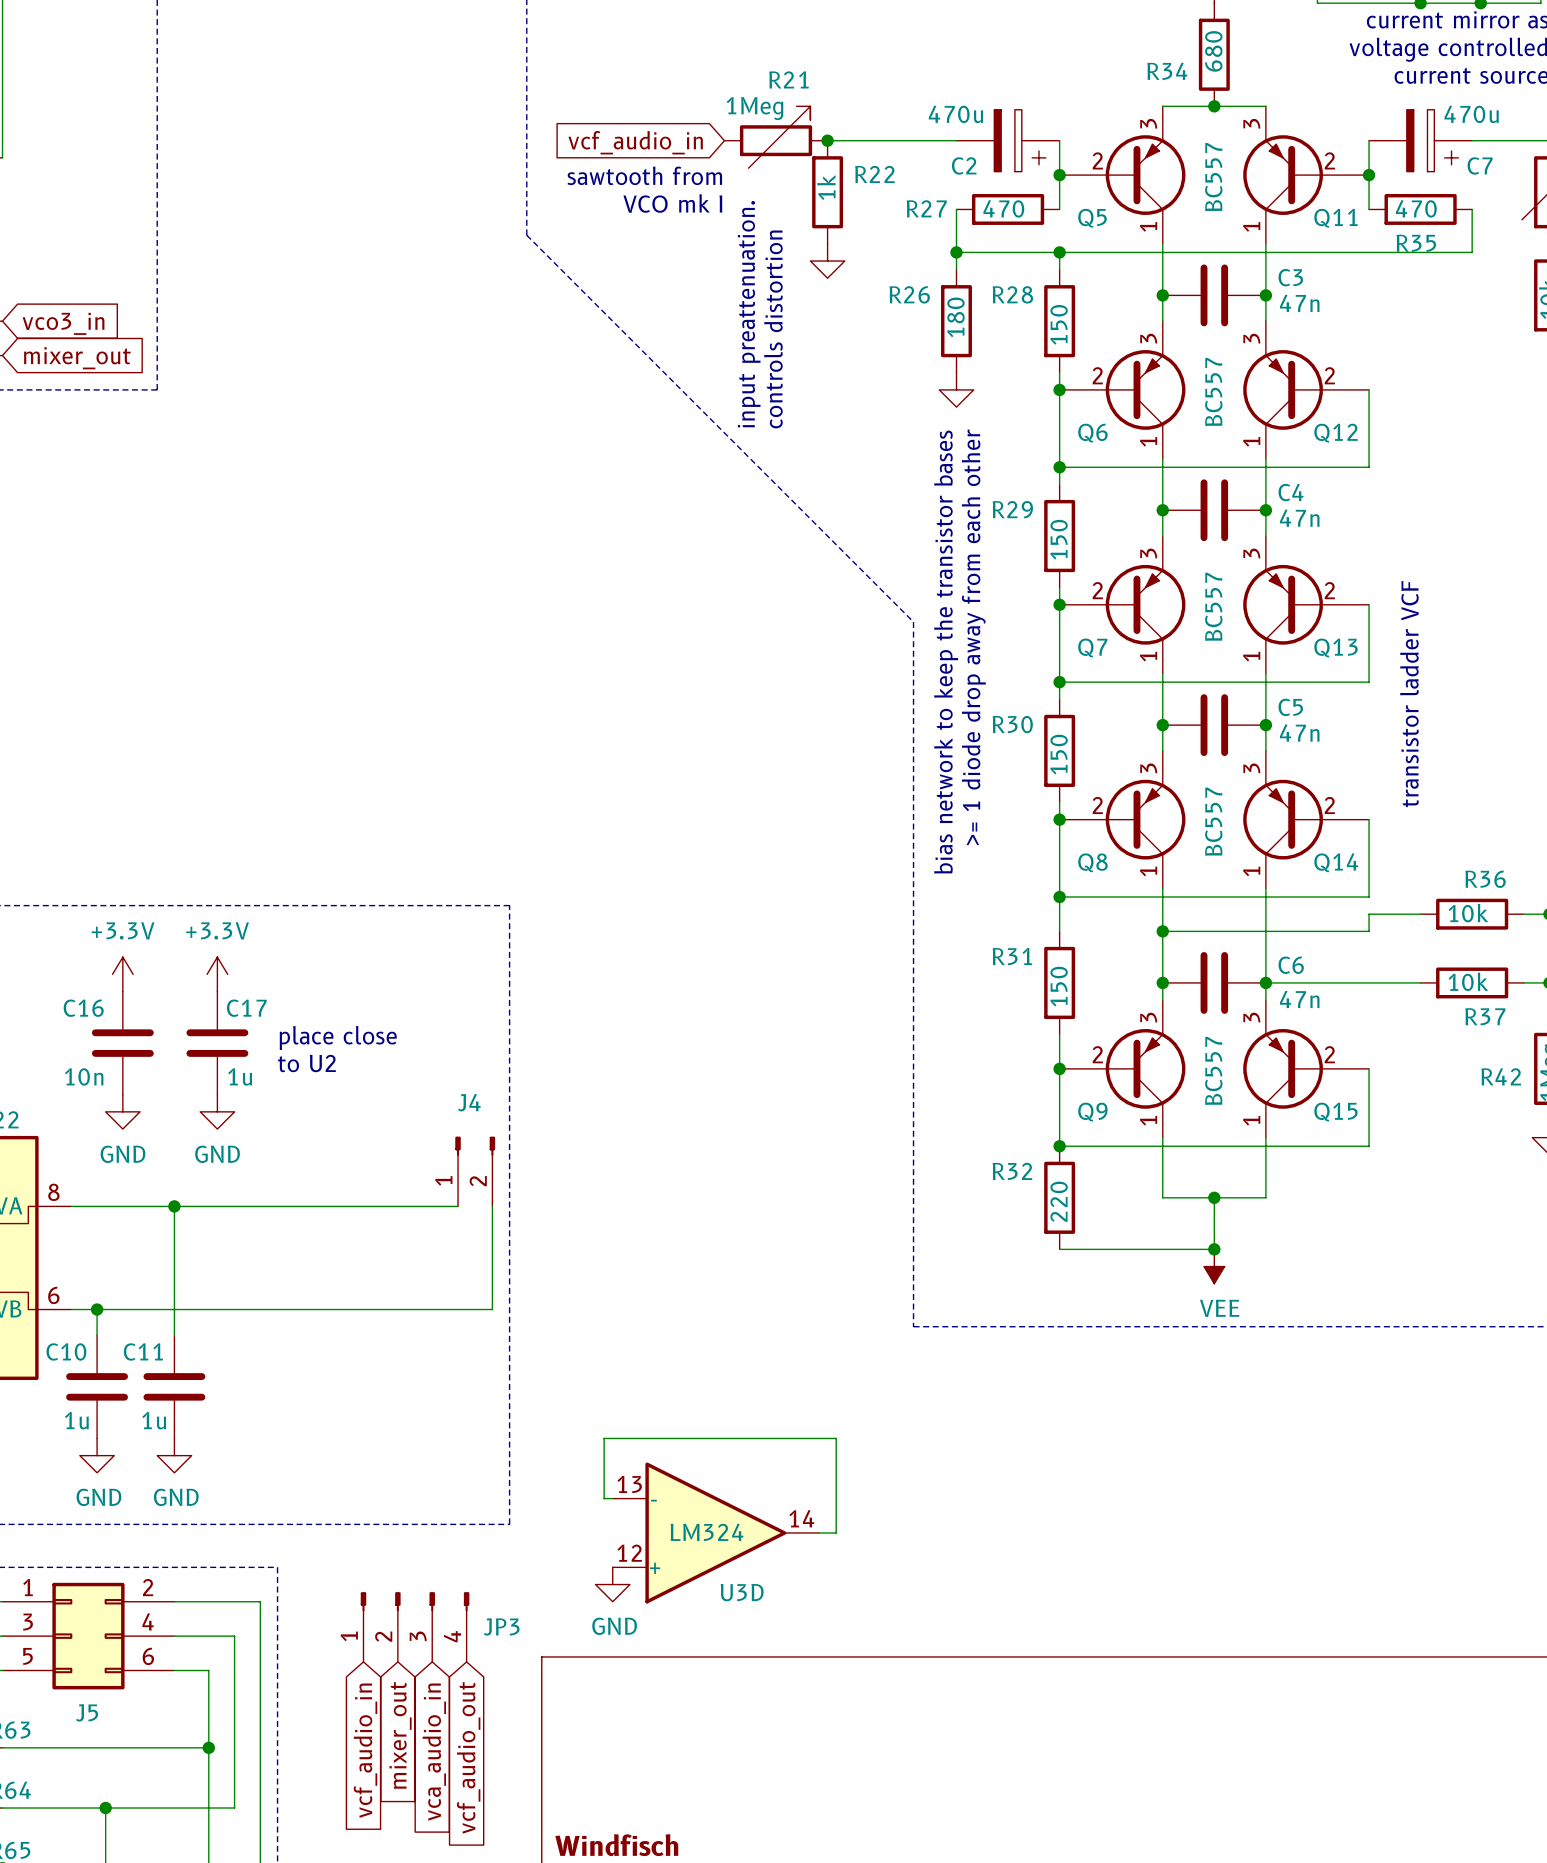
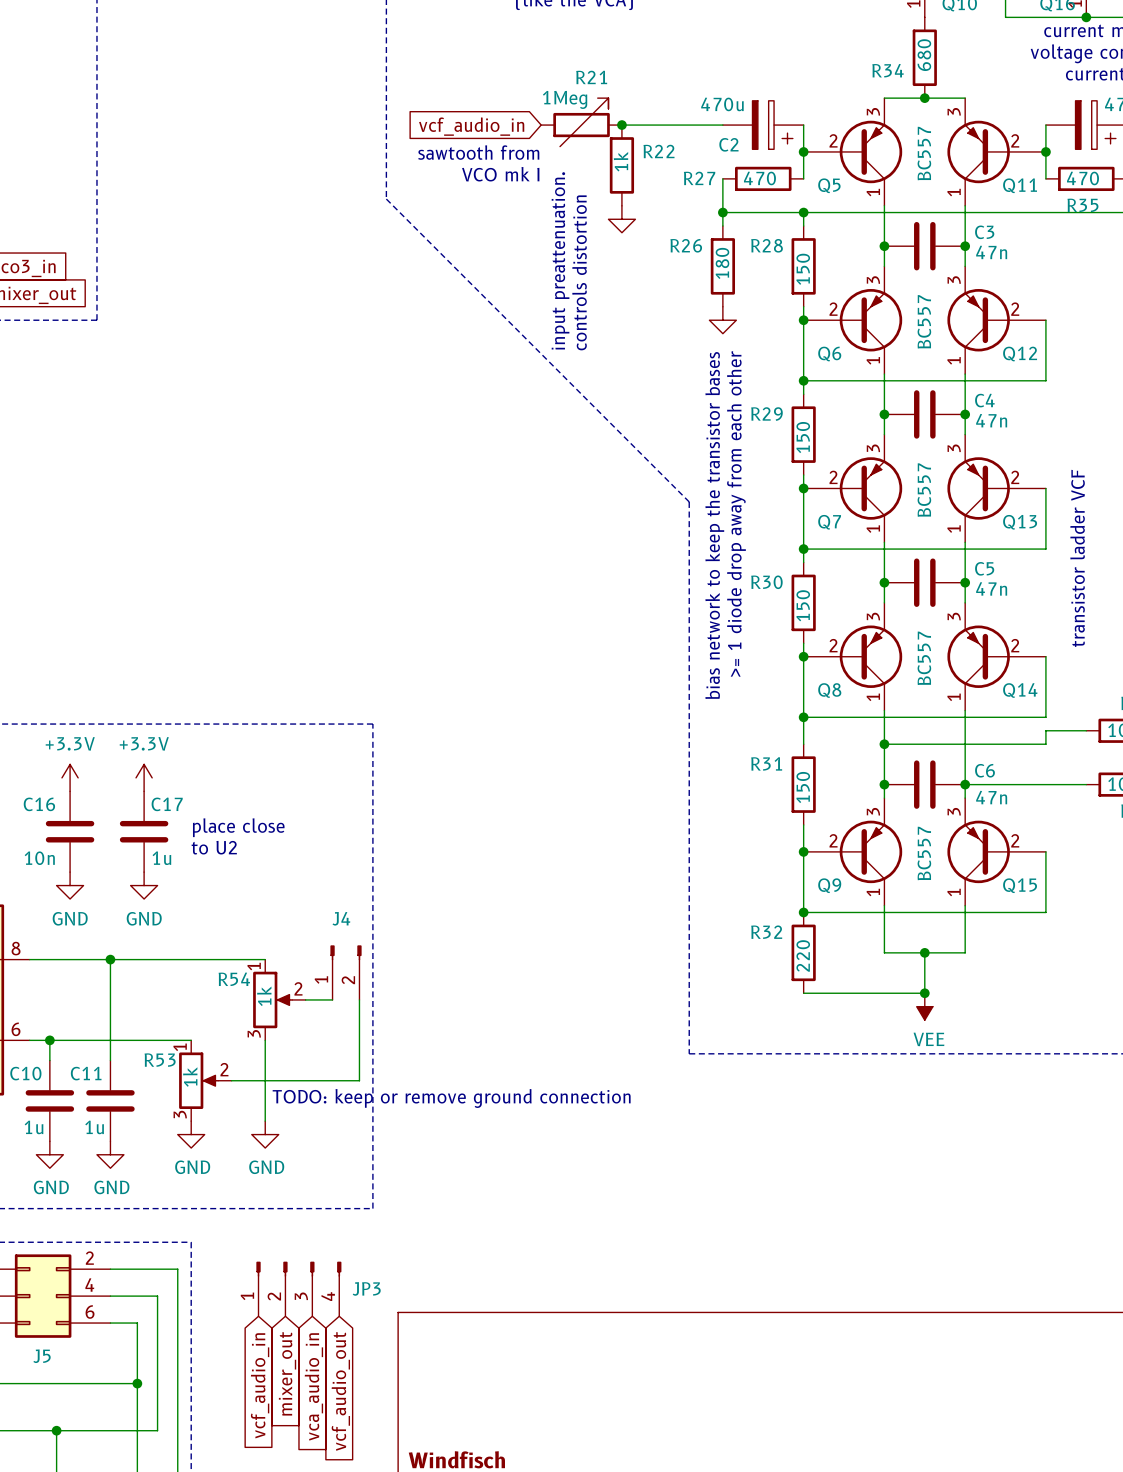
J4 position: (475, 1171) -> (346, 972)
wire: (372, 1206) (458, 1206) -> none
R54: none -> 1k (279, 999)
wire: none -> (305, 999) (332, 999)
wire: (277, 1309) (492, 1309) -> (231, 1080) (359, 1080) (359, 1040)
wire: none -> (265, 1040) (265, 1121)
R53: none -> 1k (205, 1080)
text: none -> TODO: keep or remove ground connection (451, 1098)
power symbol: none -> GND (191, 1134)
power symbol: none -> GND (265, 1134)
wire: (612, 1498) (604, 1498) (604, 1438) (836, 1438) (836, 1532) (818, 1532) -> none
U3D: LM324 (715, 1532) -> none
power symbol: GND (612, 1584) -> none

